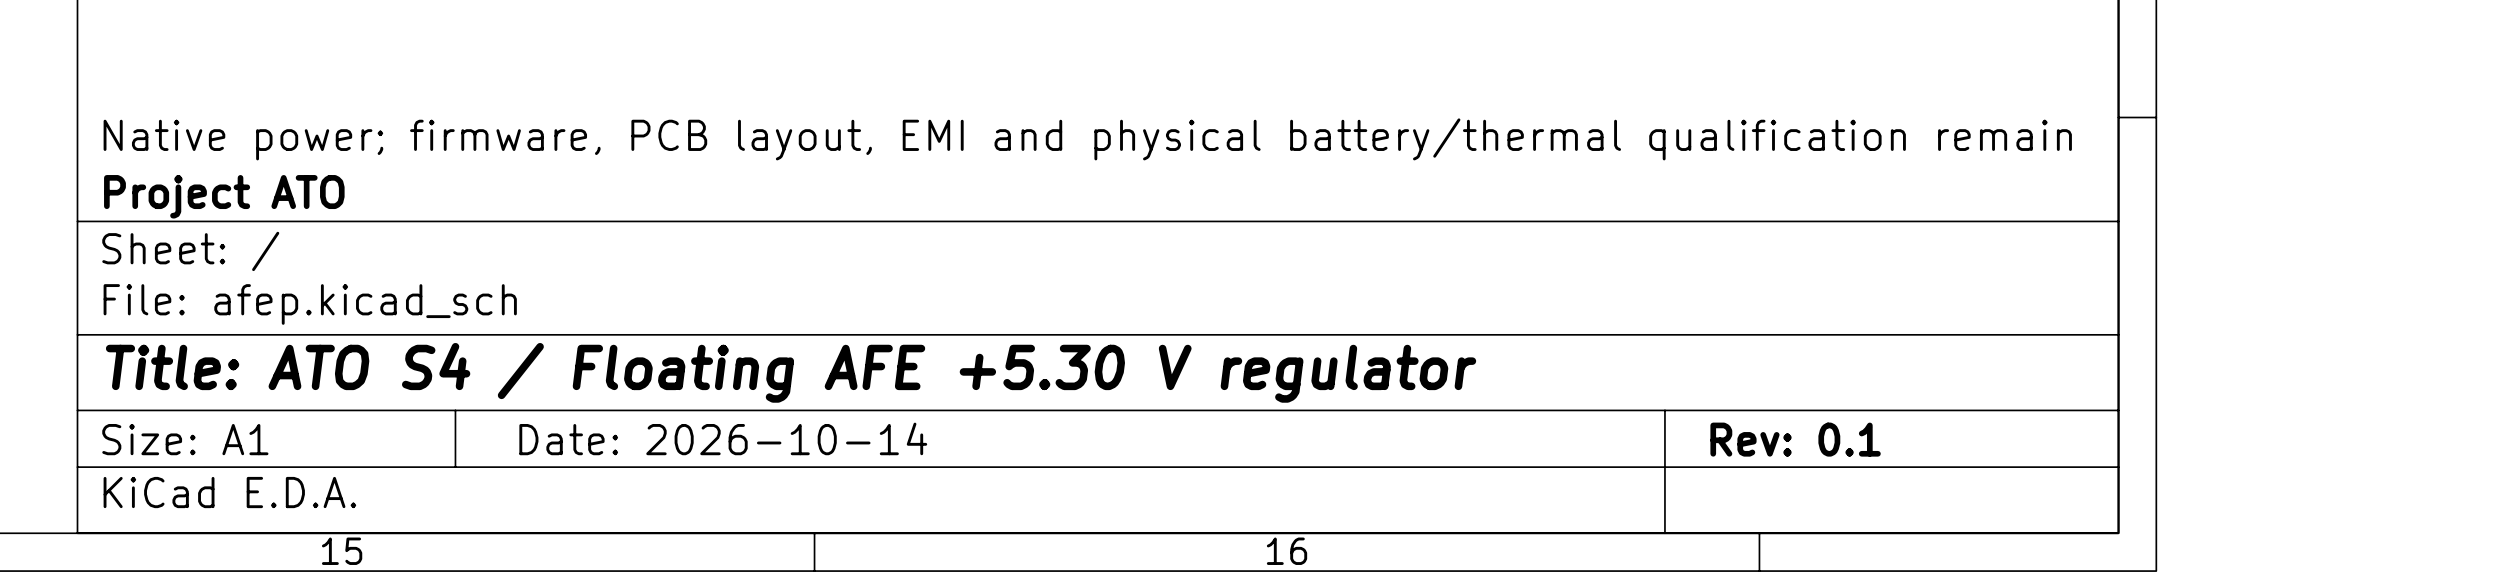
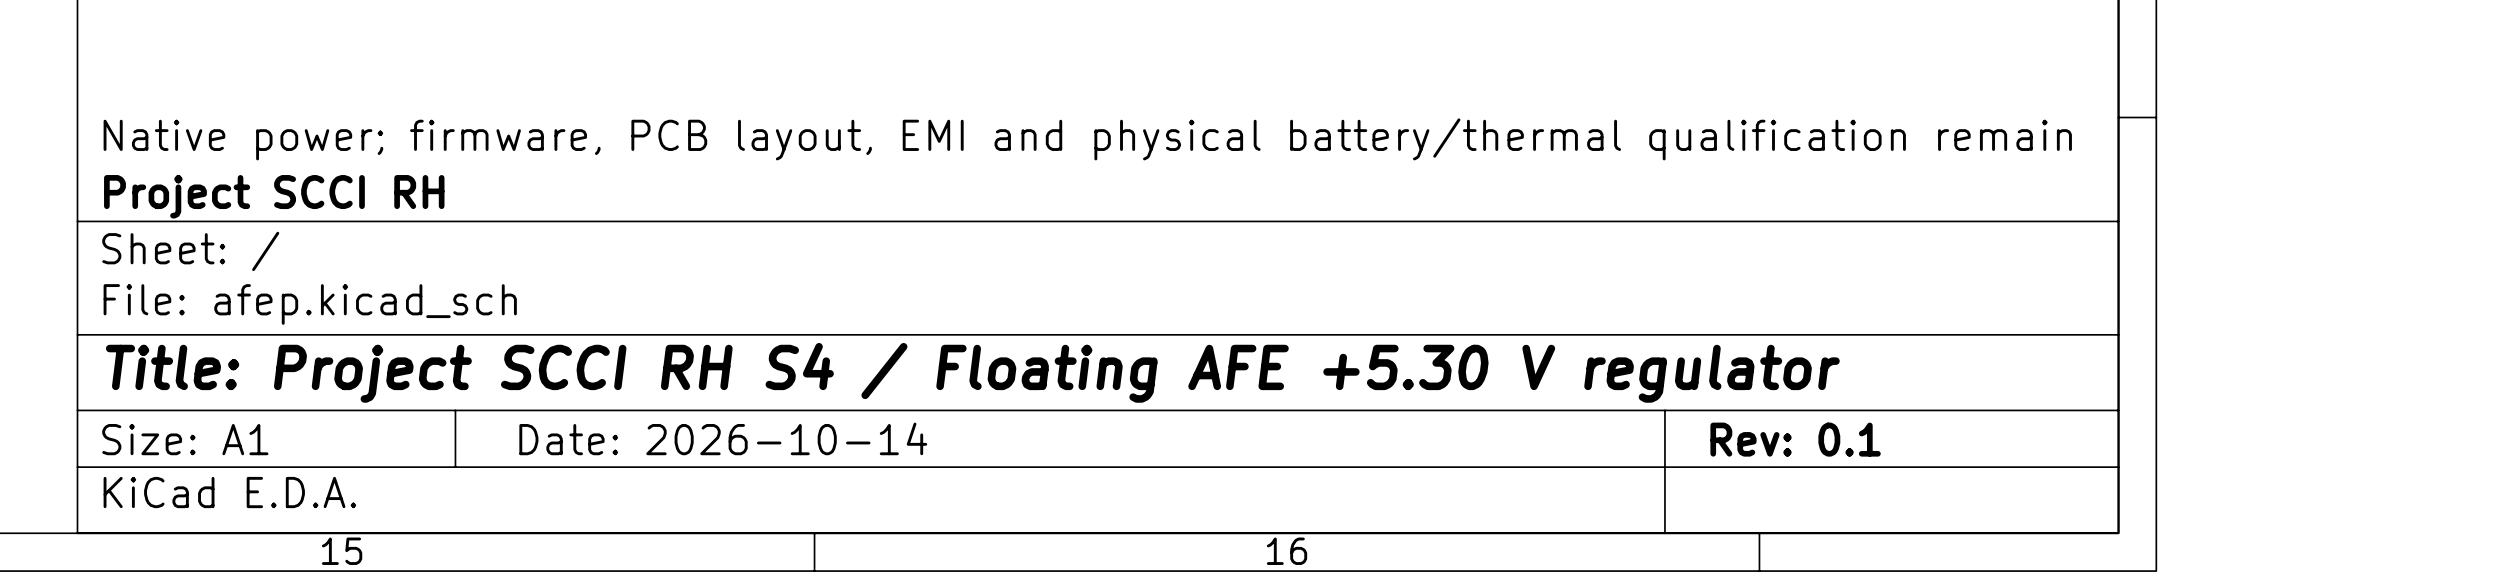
title block: Project ATO (224, 196) -> Project SCCI RH (274, 196)
title block: Title: ATO S4 / Floating AFE +5.30 V regulator (791, 372) -> Title: Project SCCI RH S4 / Floating AFE +5.30 V regulator (972, 372)

